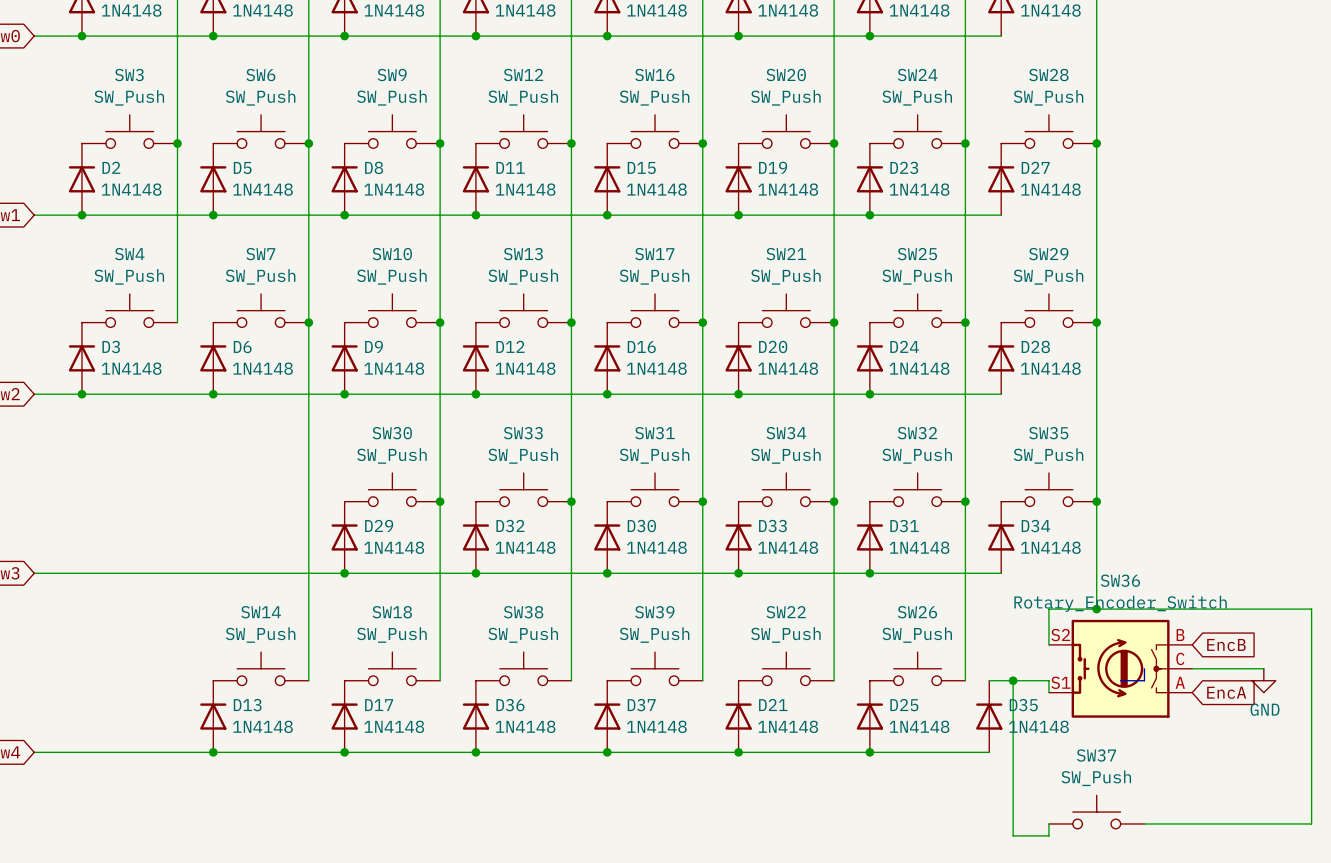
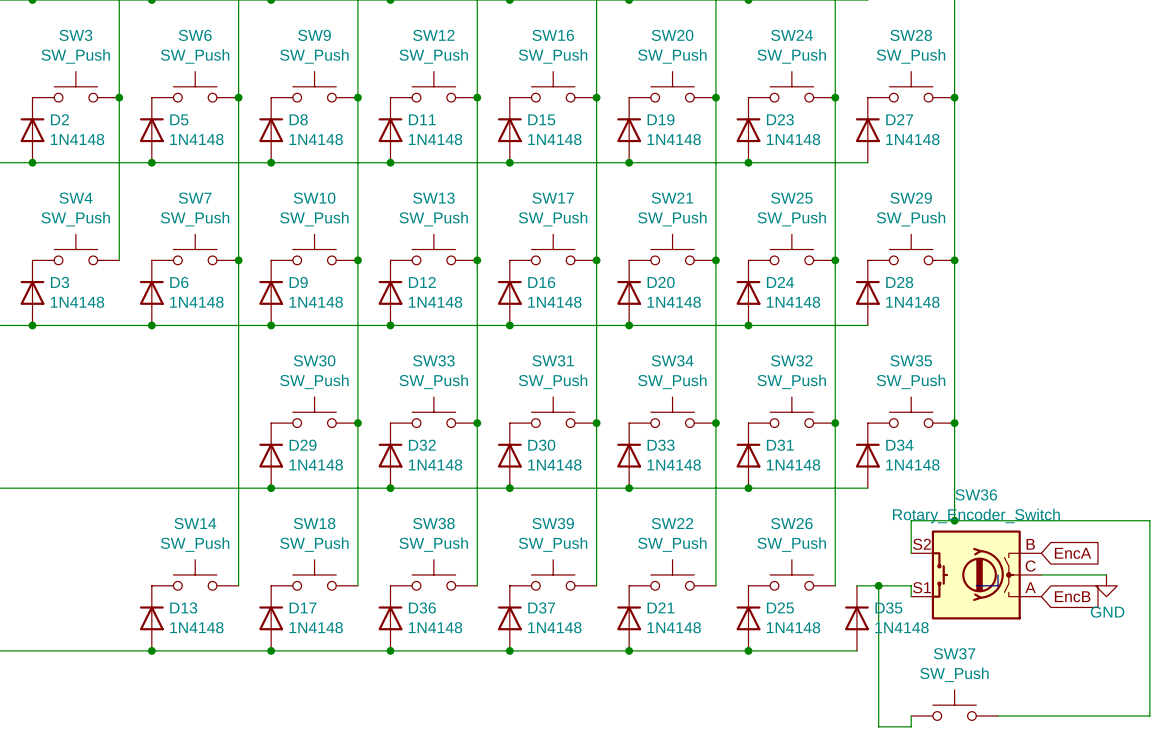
SW36 symbol: [1048, 619, 1193, 718] -> [911, 530, 1042, 620]
global label: EncB (1226, 645) -> EncA (1073, 553)
global label: EncA (1226, 692) -> EncB (1072, 596)

